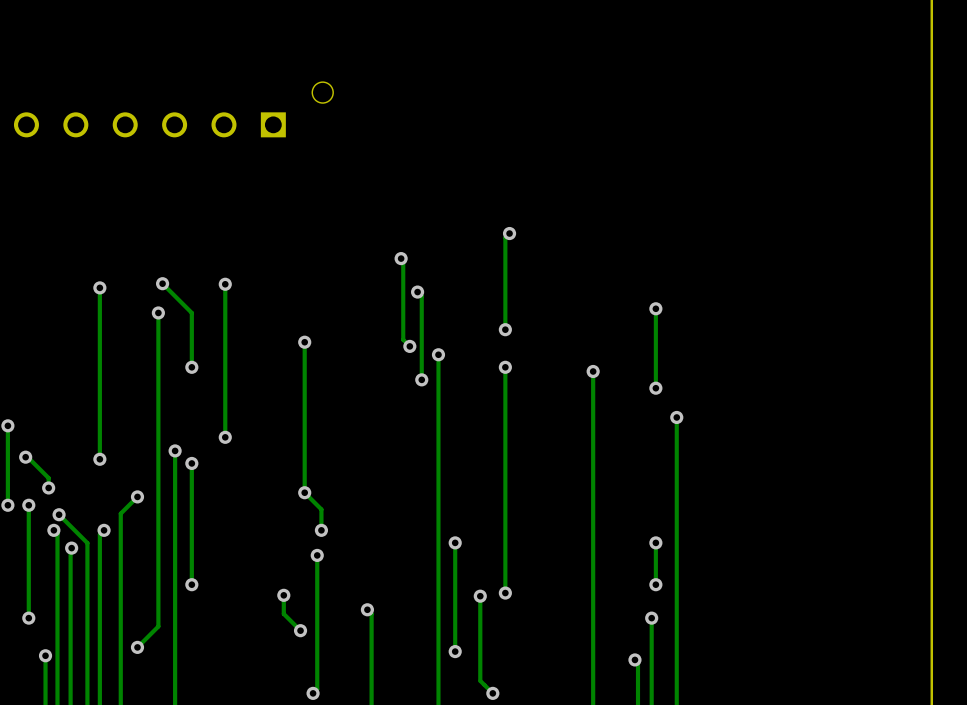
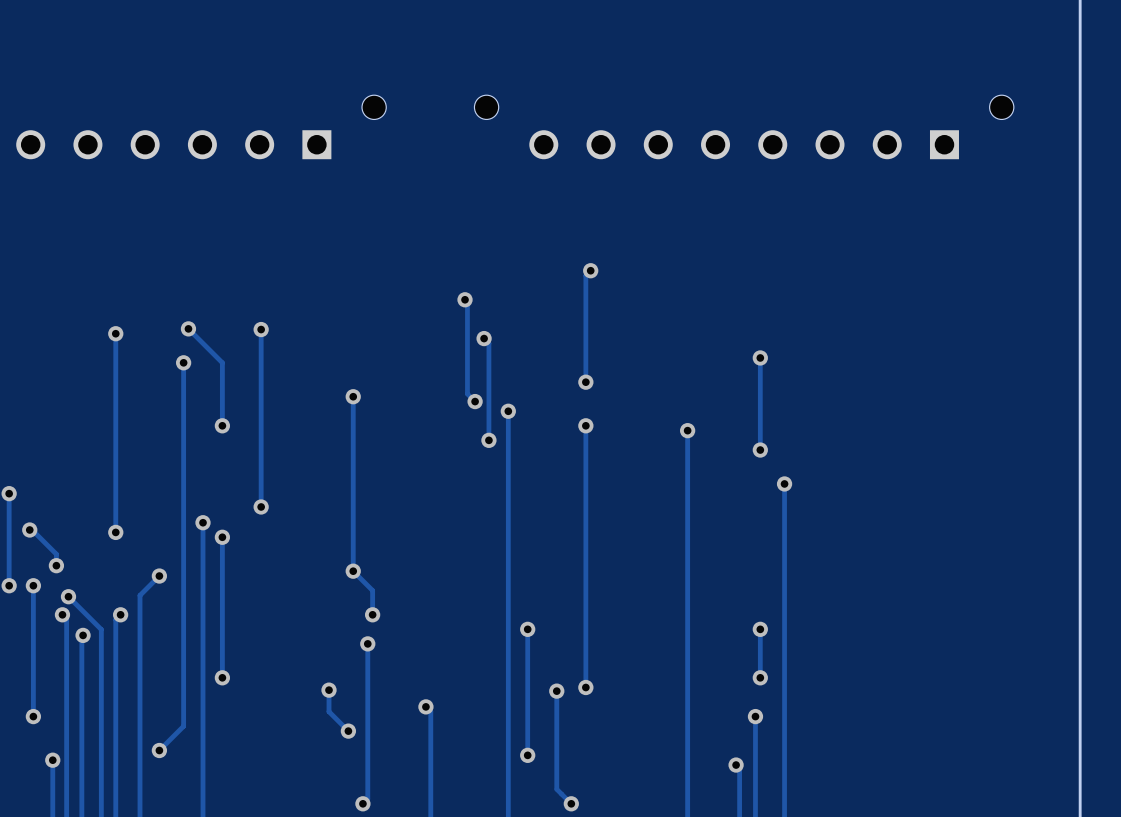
part: none -> (744, 127)

